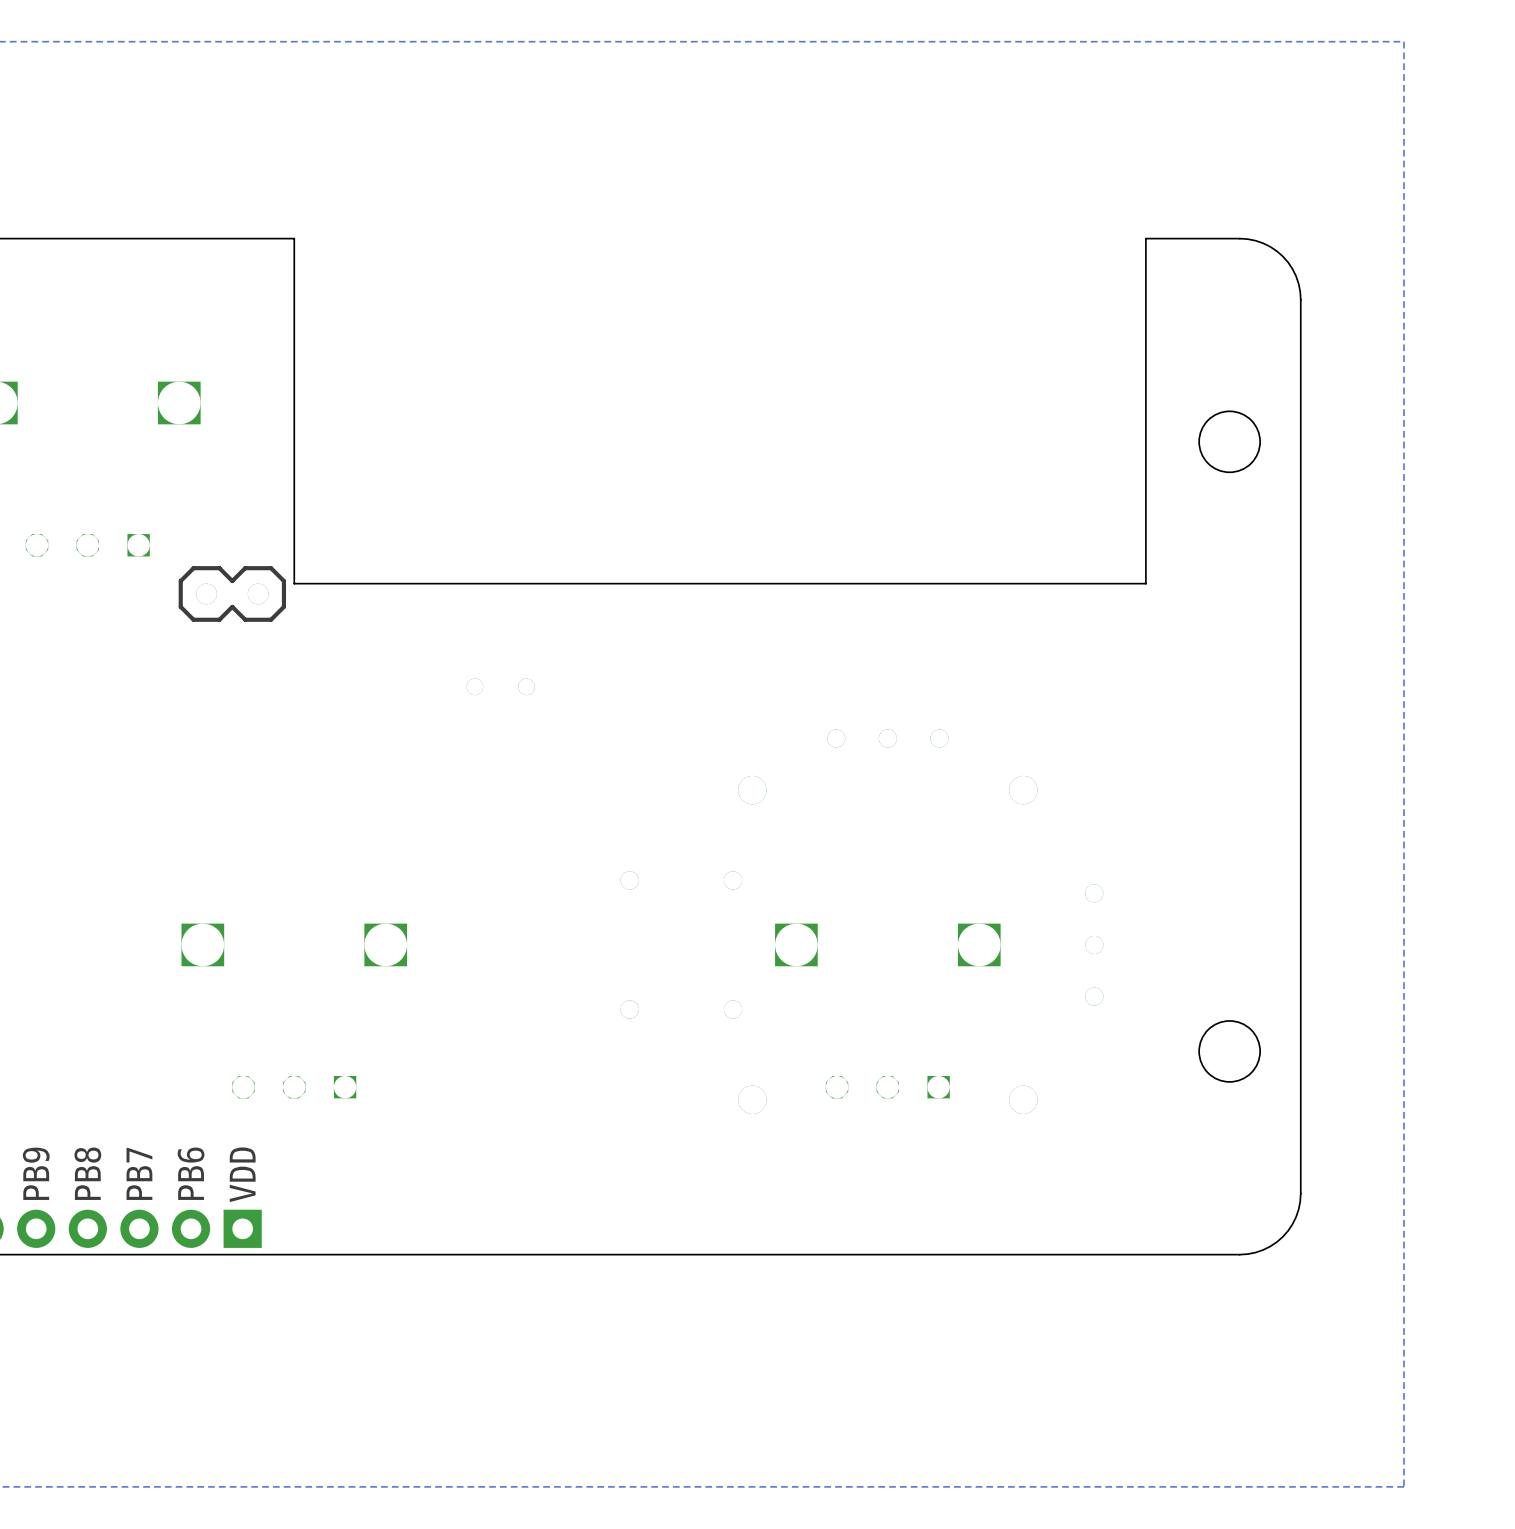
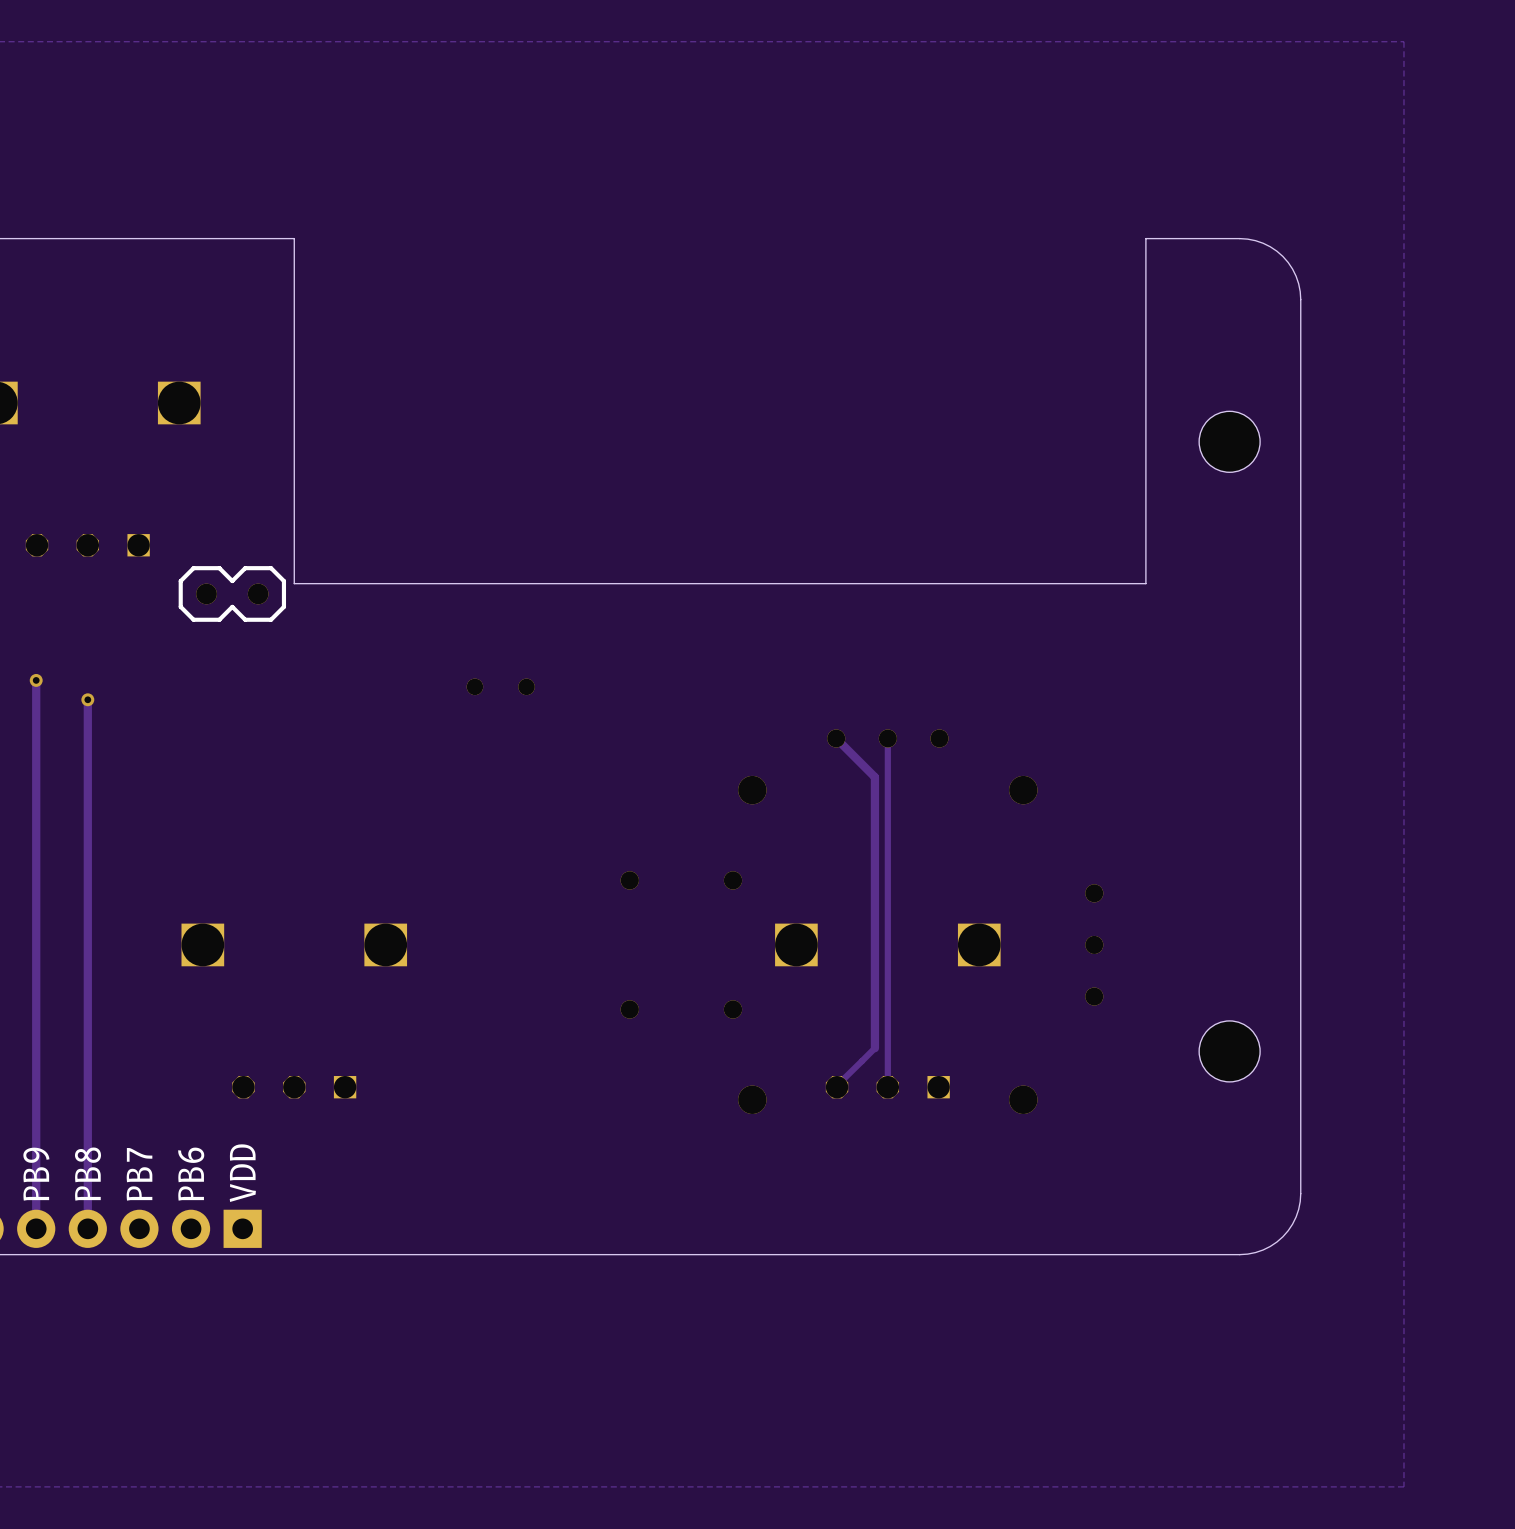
track: none -> (36, 680) (36, 1228)
via: none -> (36, 680)
track: none -> (87, 699) (87, 1228)
via: none -> (87, 699)
track: none -> (836, 738) (874, 777) (874, 1048) (837, 1087)
track: none -> (887, 738) (887, 1087)

